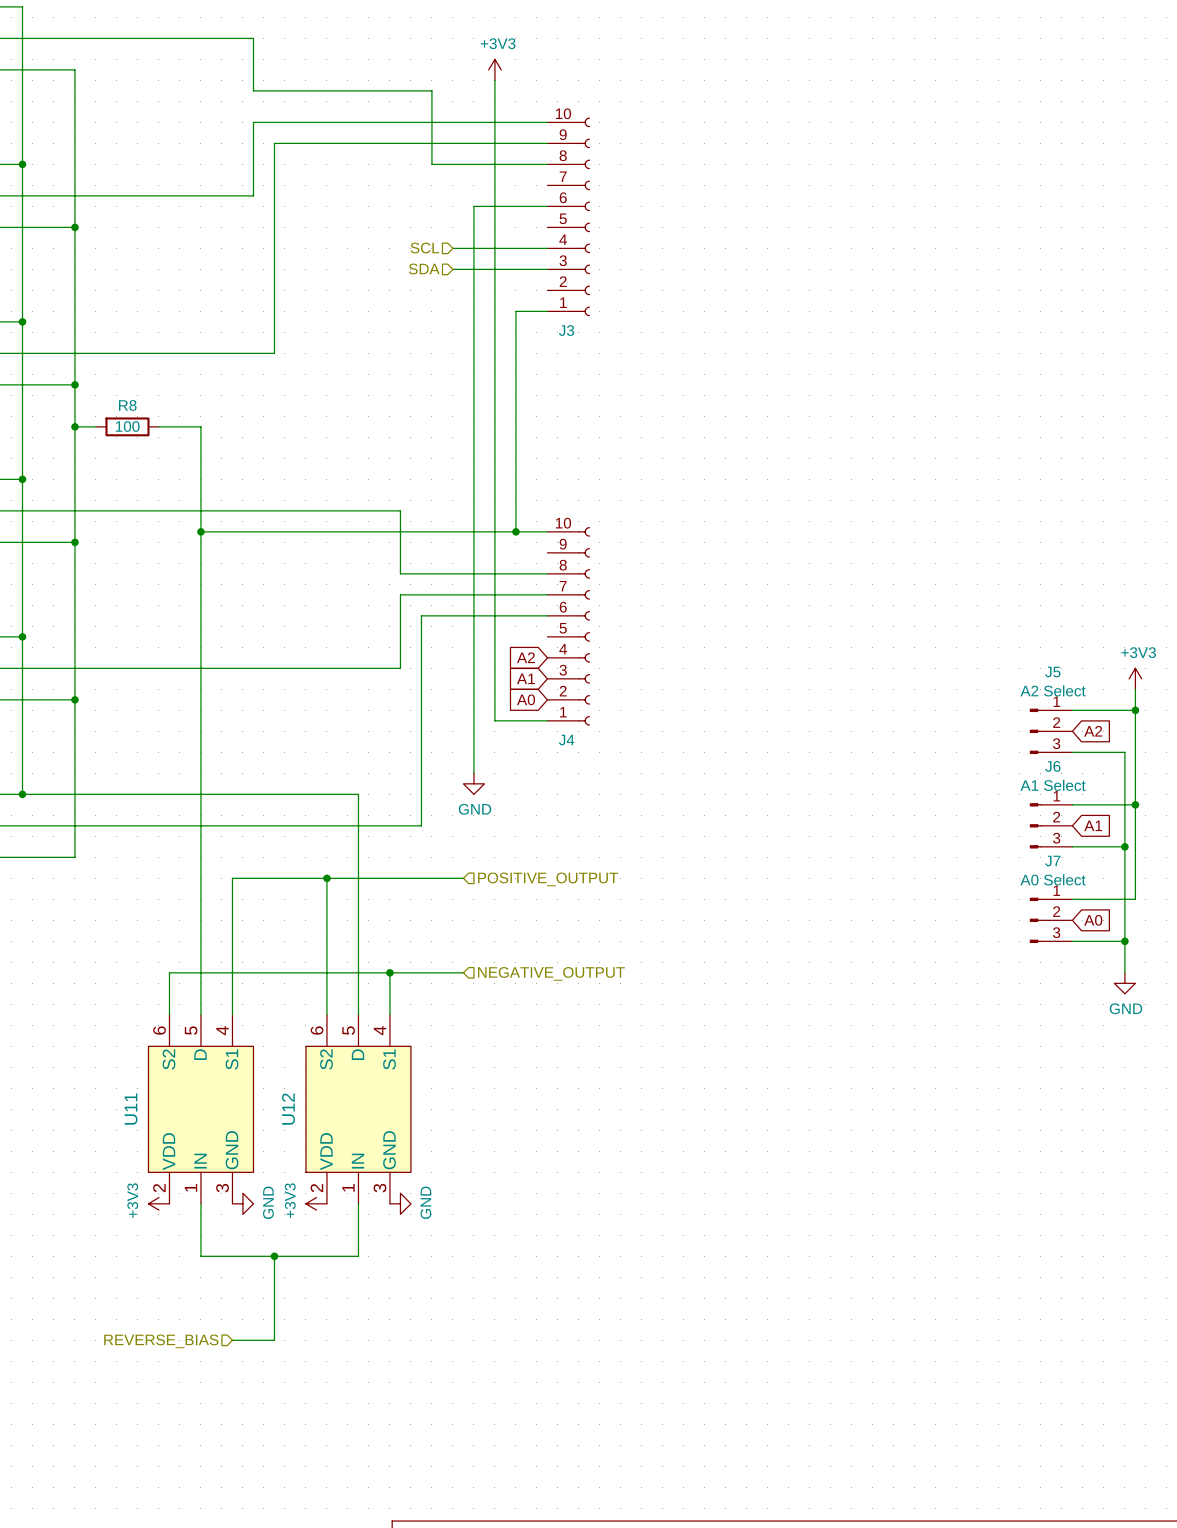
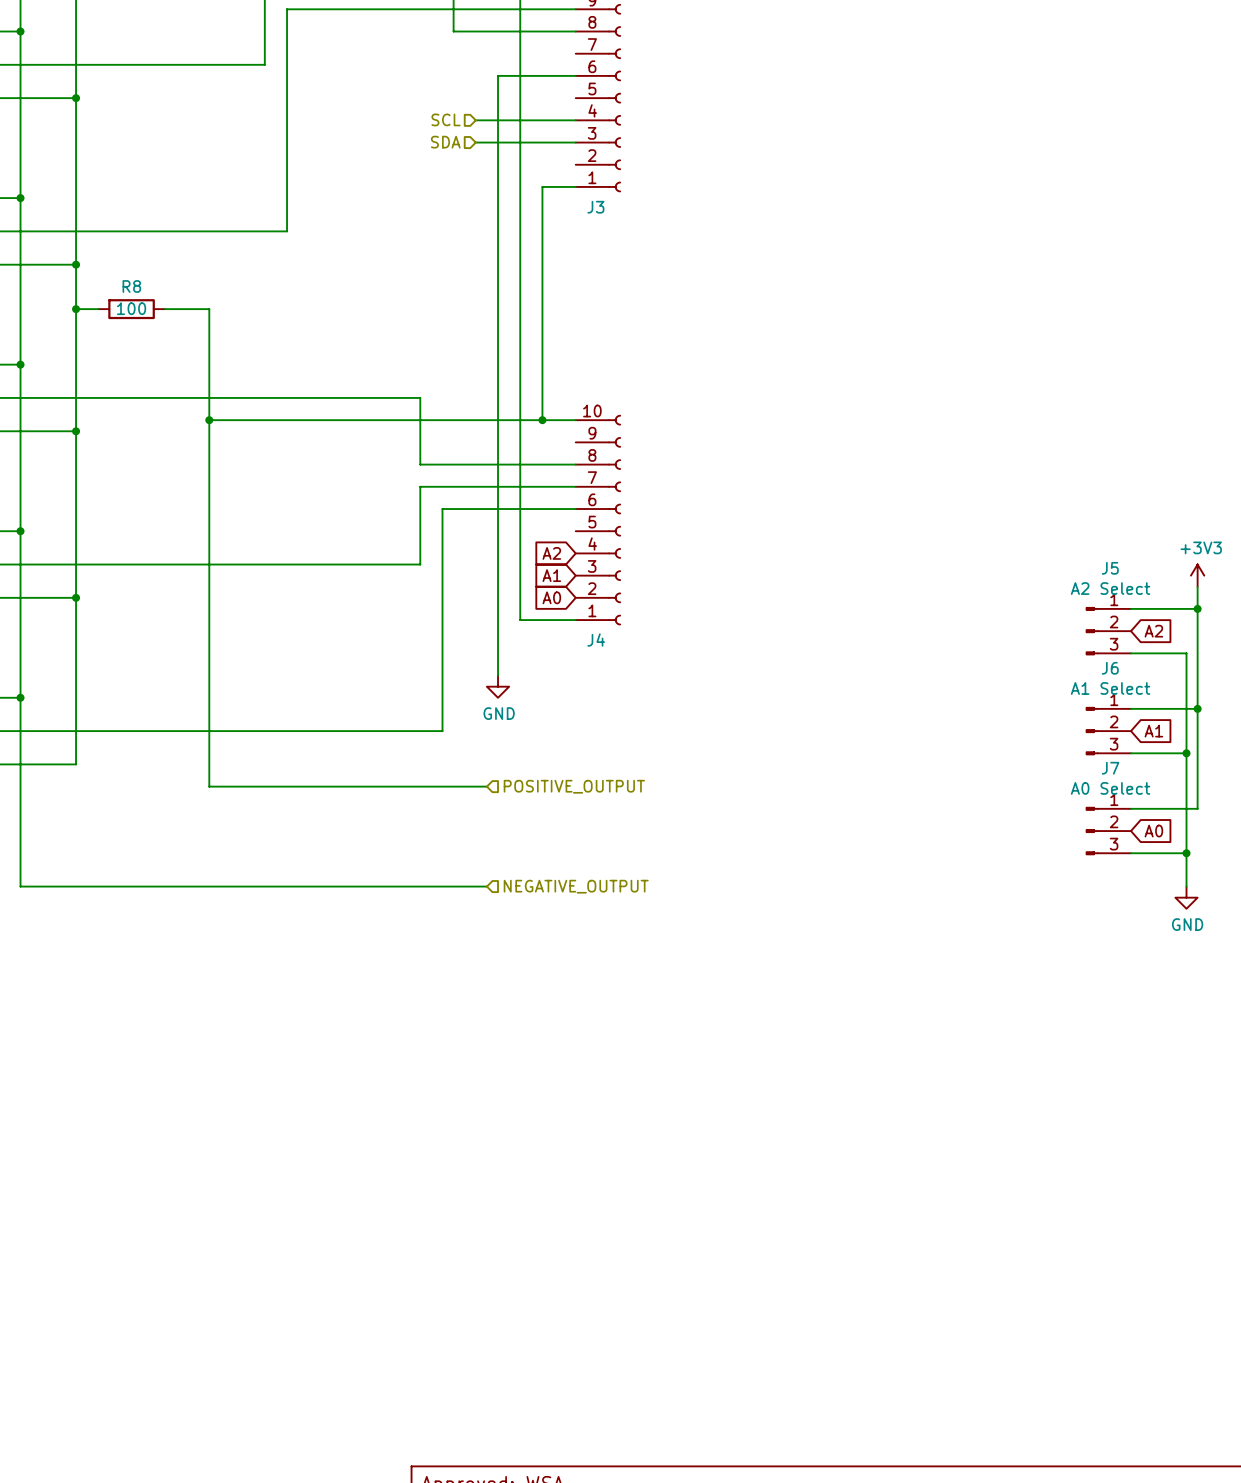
wire: (22, 794) (358, 794) (358, 1014) -> (20, 697) (20, 886) (175, 886)
wire: (200, 878) (200, 1014) -> (209, 786) (242, 786)
wire: (232, 878) (232, 1014) -> none
wire: (326, 878) (326, 1014) -> none
junction: (326, 878) -> none
wire: (169, 972) (169, 1014) -> none
wire: (389, 972) (389, 1014) -> none
junction: (389, 972) -> none
U11: (200, 1109) -> none
U12: (358, 1109) -> none
power symbol: +3V3 (158, 1203) -> none
wire: (200, 1203) (200, 1256) (358, 1256) (358, 1203) -> none
power symbol: GND (242, 1203) -> none
power symbol: +3V3 (316, 1203) -> none
power symbol: GND (400, 1203) -> none
wire: (274, 1256) (274, 1340) (232, 1340) -> none
junction: (274, 1256) -> none
hierarchical label: REVERSE_BIAS (161, 1341) -> none

